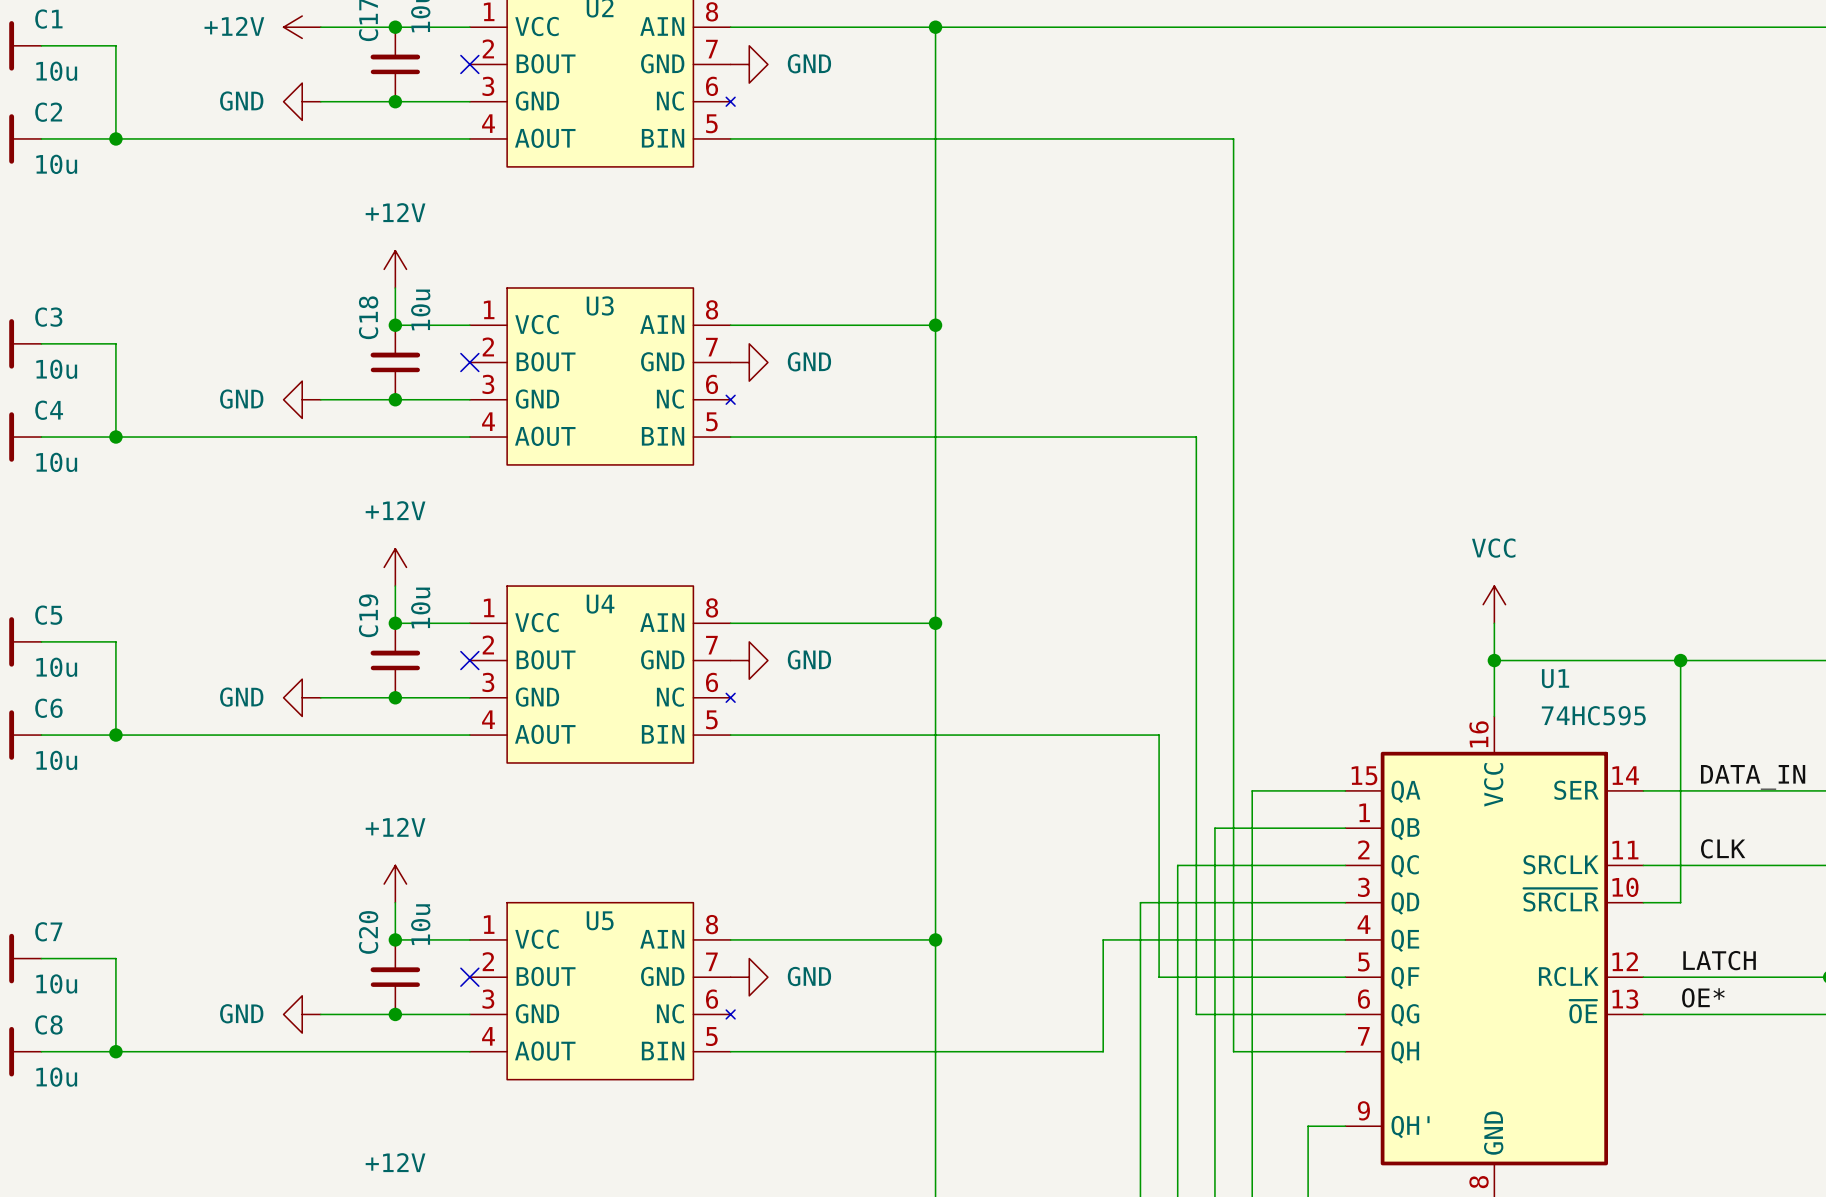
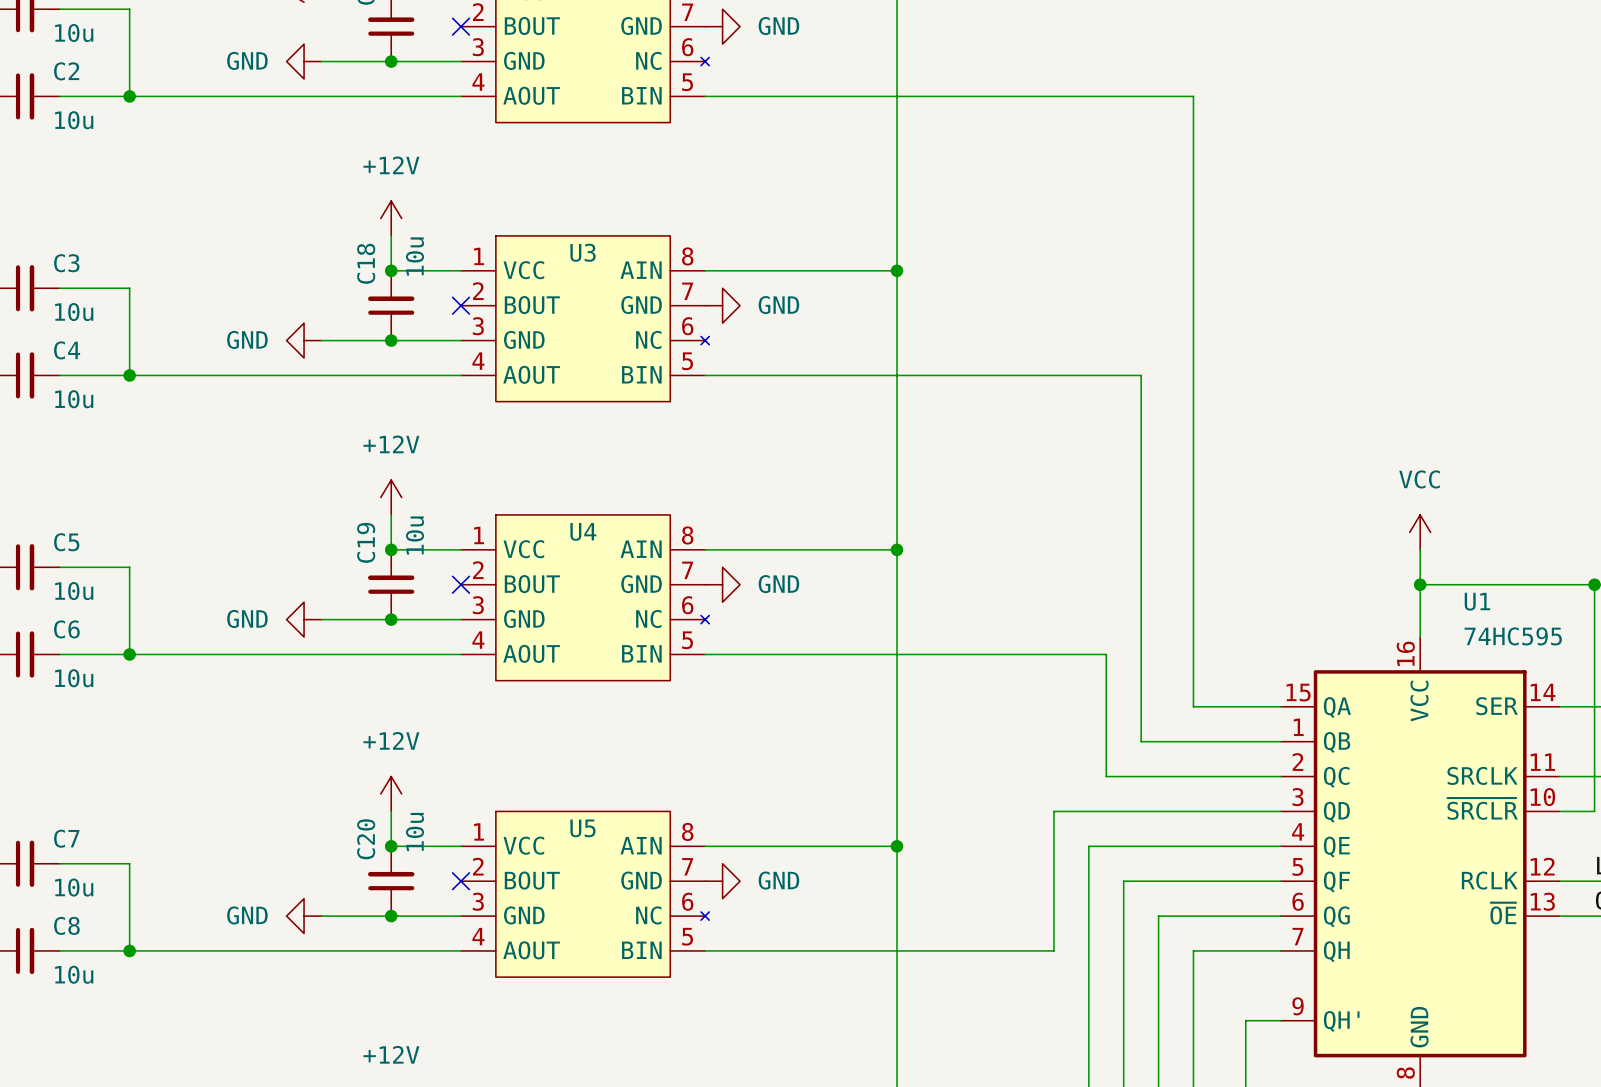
wire: (1233, 138) (1233, 1051) (1252, 1051) (1252, 790) -> (1176, 96) (1193, 96) (1193, 706)
wire: (1196, 828) (1196, 1014) (1214, 1014) (1214, 828) -> (1141, 741) (1158, 741)
wire: (1159, 865) (1159, 977) (1177, 977) (1177, 865) -> (1106, 776) (1123, 776)
wire: (1140, 902) (1140, 939) (1103, 939) -> (1088, 811) (1053, 811) (1053, 846)

